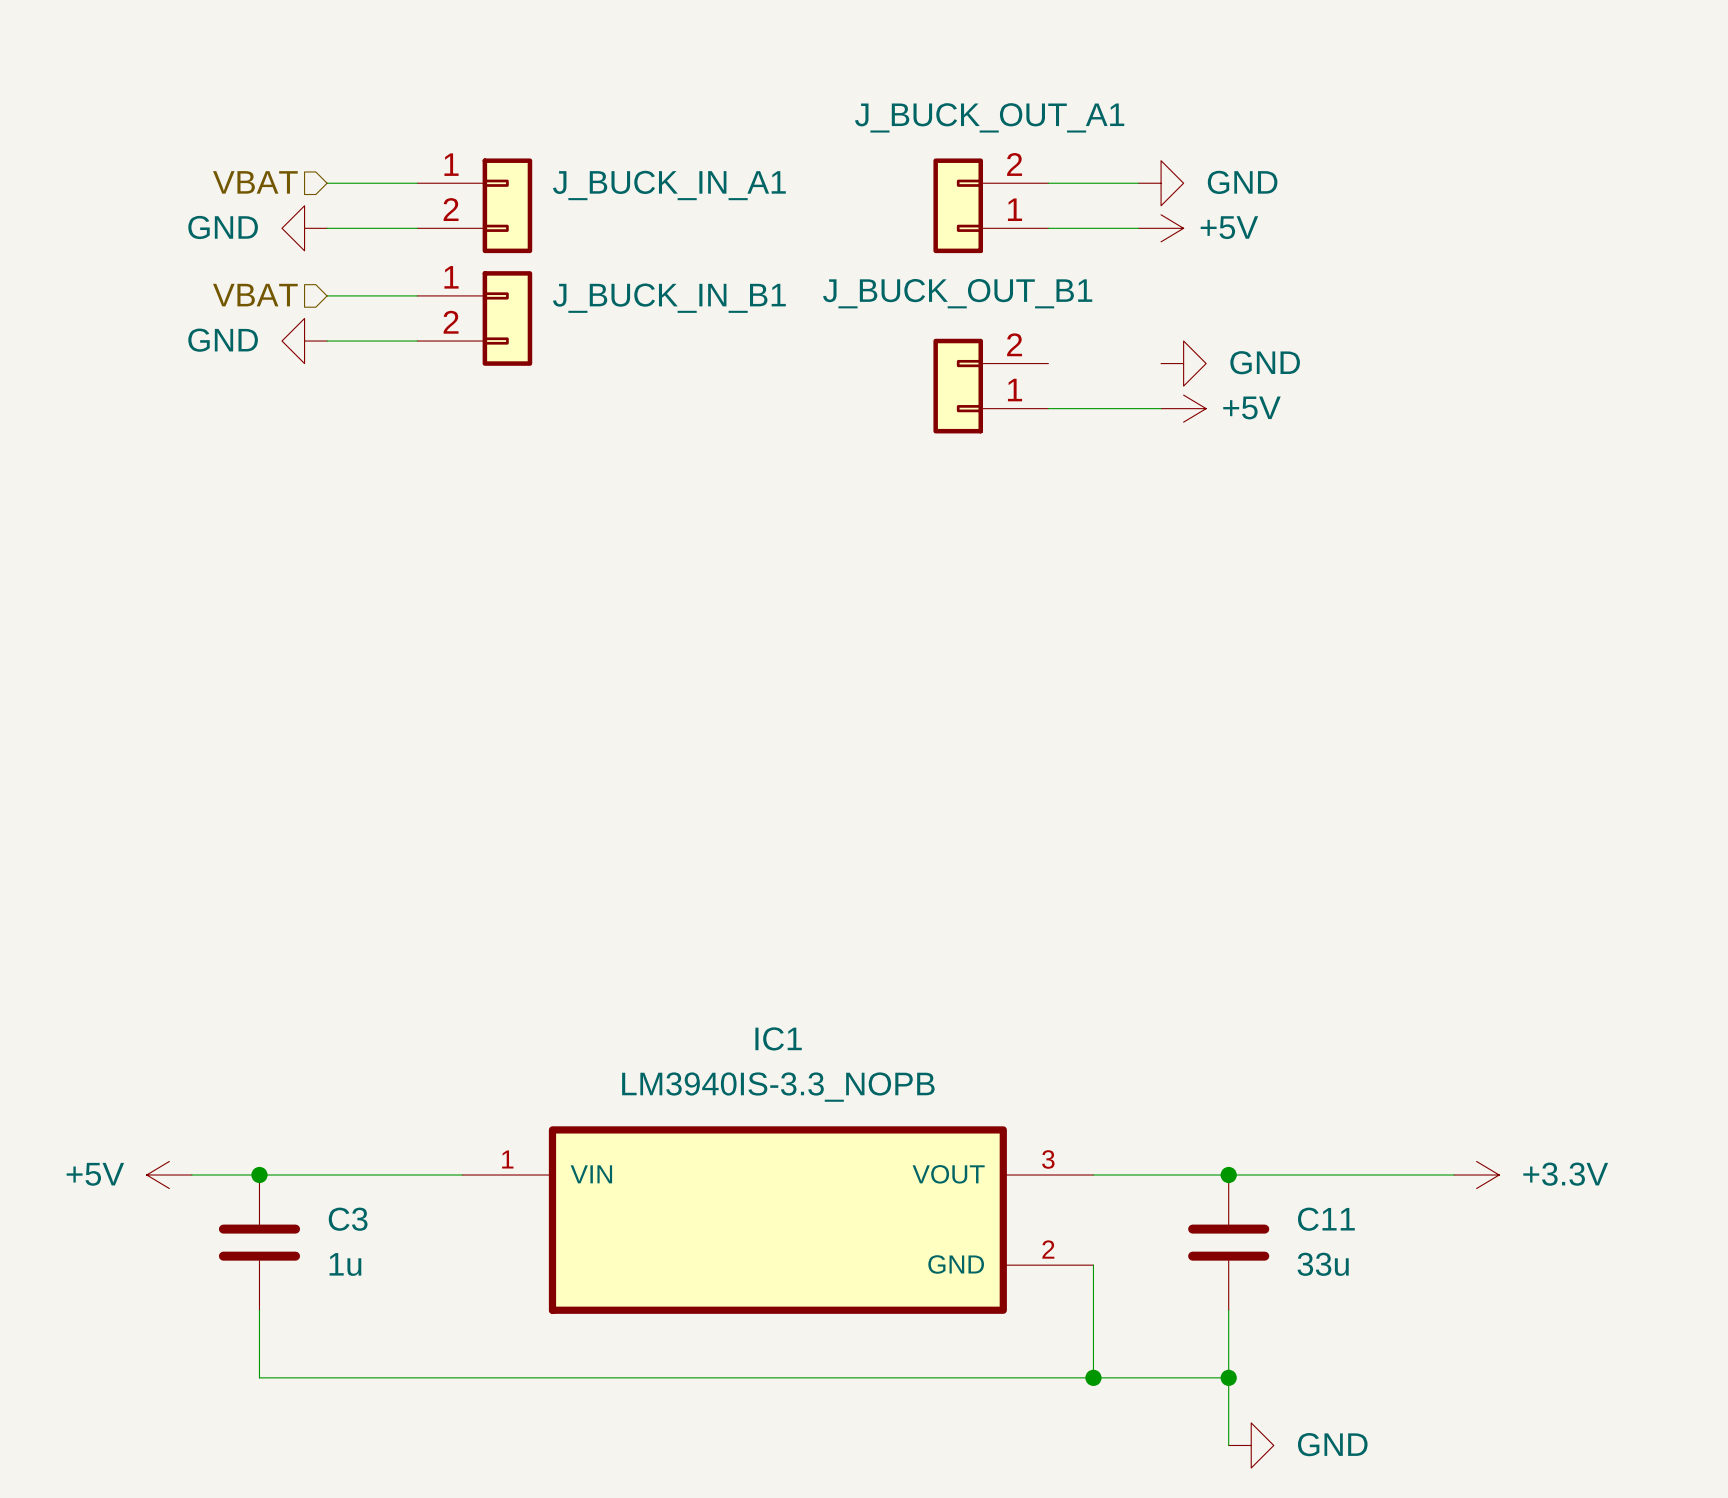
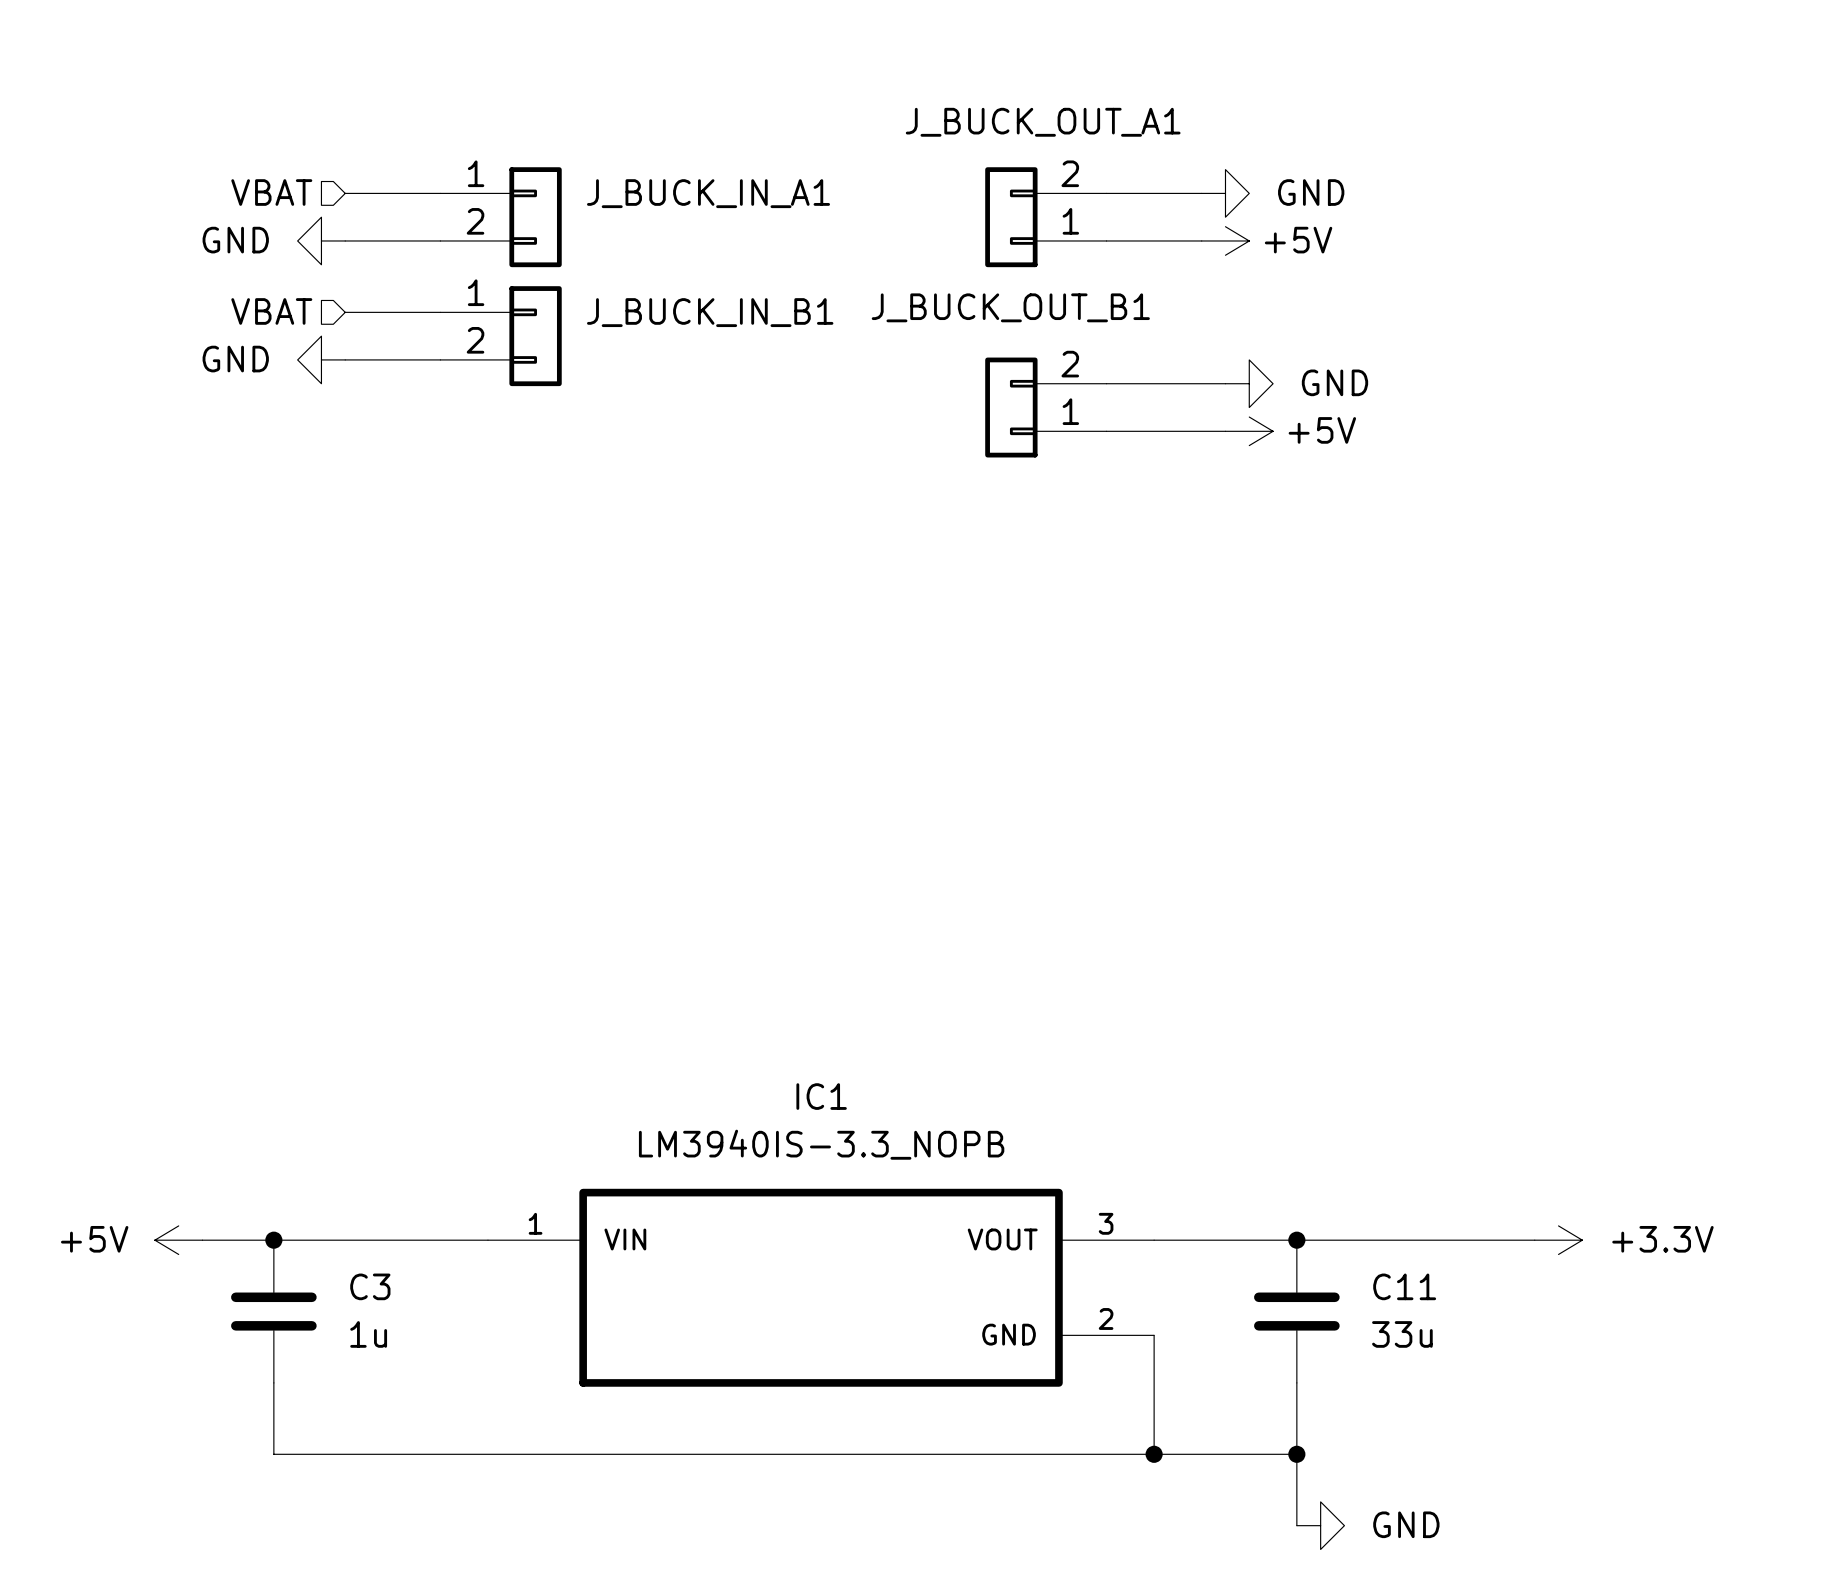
wire: none -> (1106, 383) (1225, 383)

